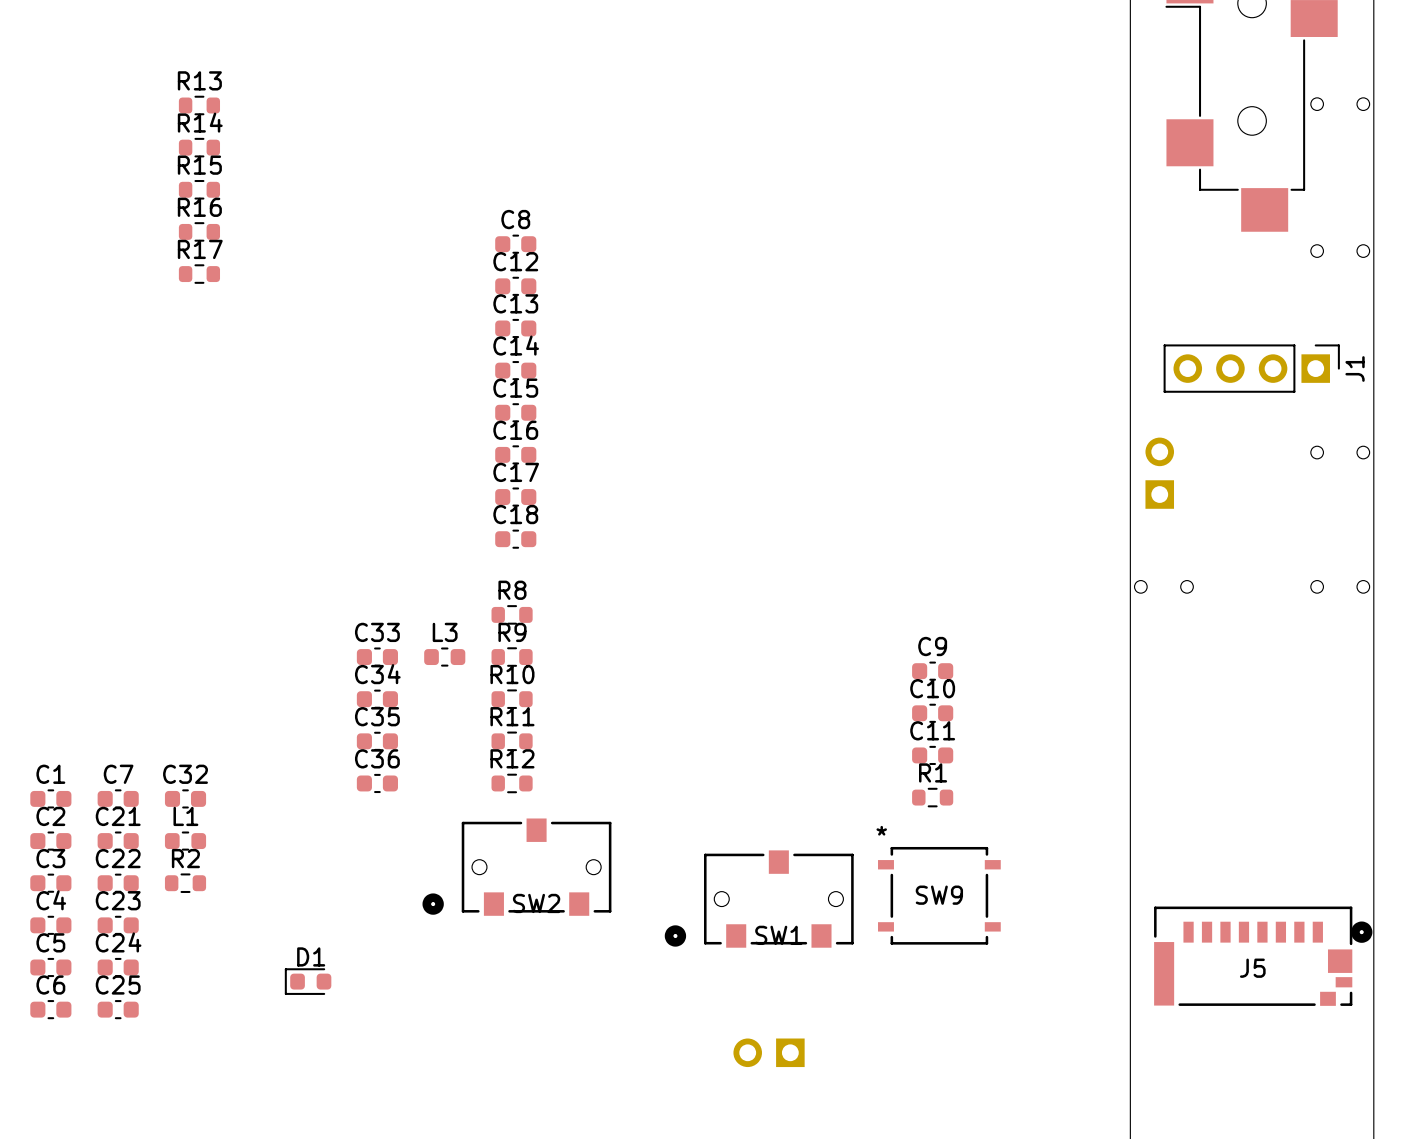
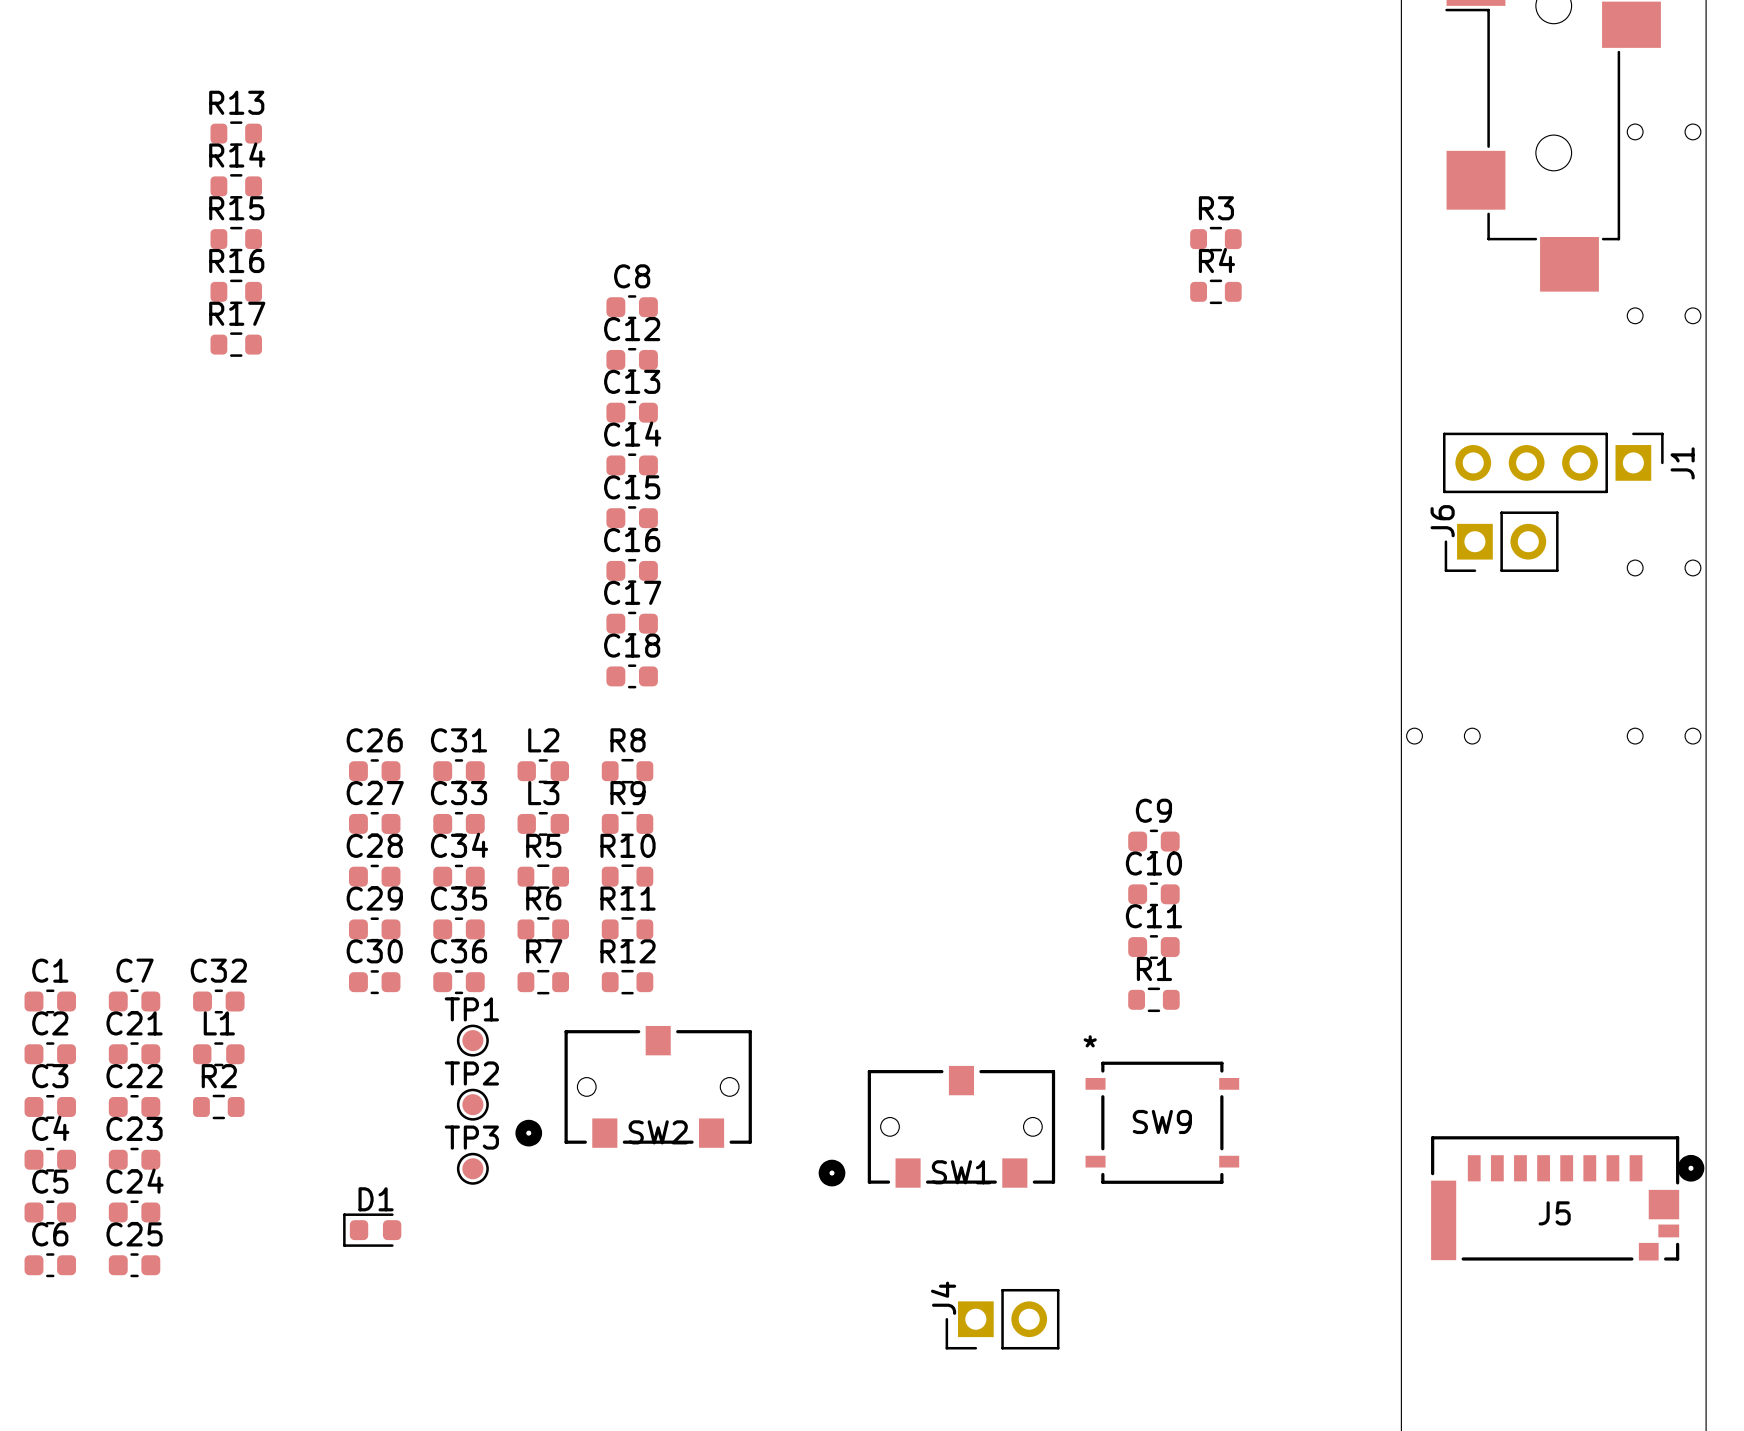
R3: none -> (1215, 239)
R4: none -> (1215, 291)
J6 side: bottom (1159, 473) -> top (1501, 541)
C26: none -> (374, 771)
C31: none -> (459, 771)
L2: none -> (543, 771)
C27: none -> (374, 823)
C28: none -> (374, 876)
R5: none -> (543, 876)
C29: none -> (374, 929)
R6: none -> (543, 929)
C30: none -> (374, 982)
R7: none -> (543, 982)
TP1: none -> (472, 1040)
TP2: none -> (472, 1104)
TP3: none -> (472, 1168)
J4 side: bottom (769, 1052) -> top (1002, 1319)

